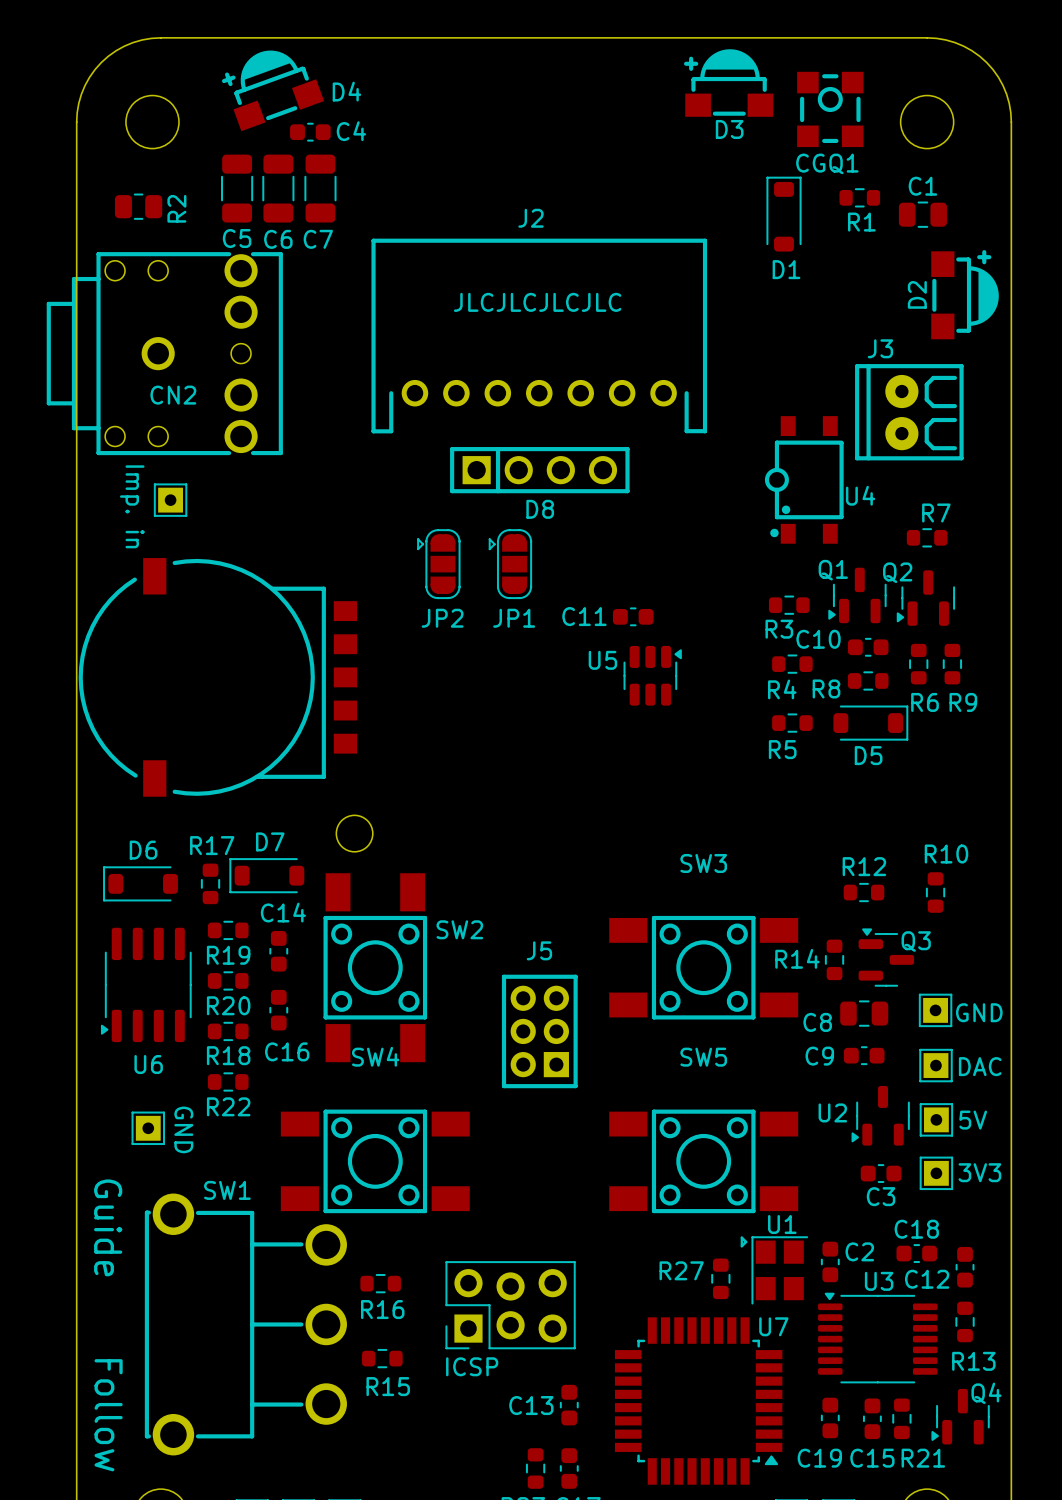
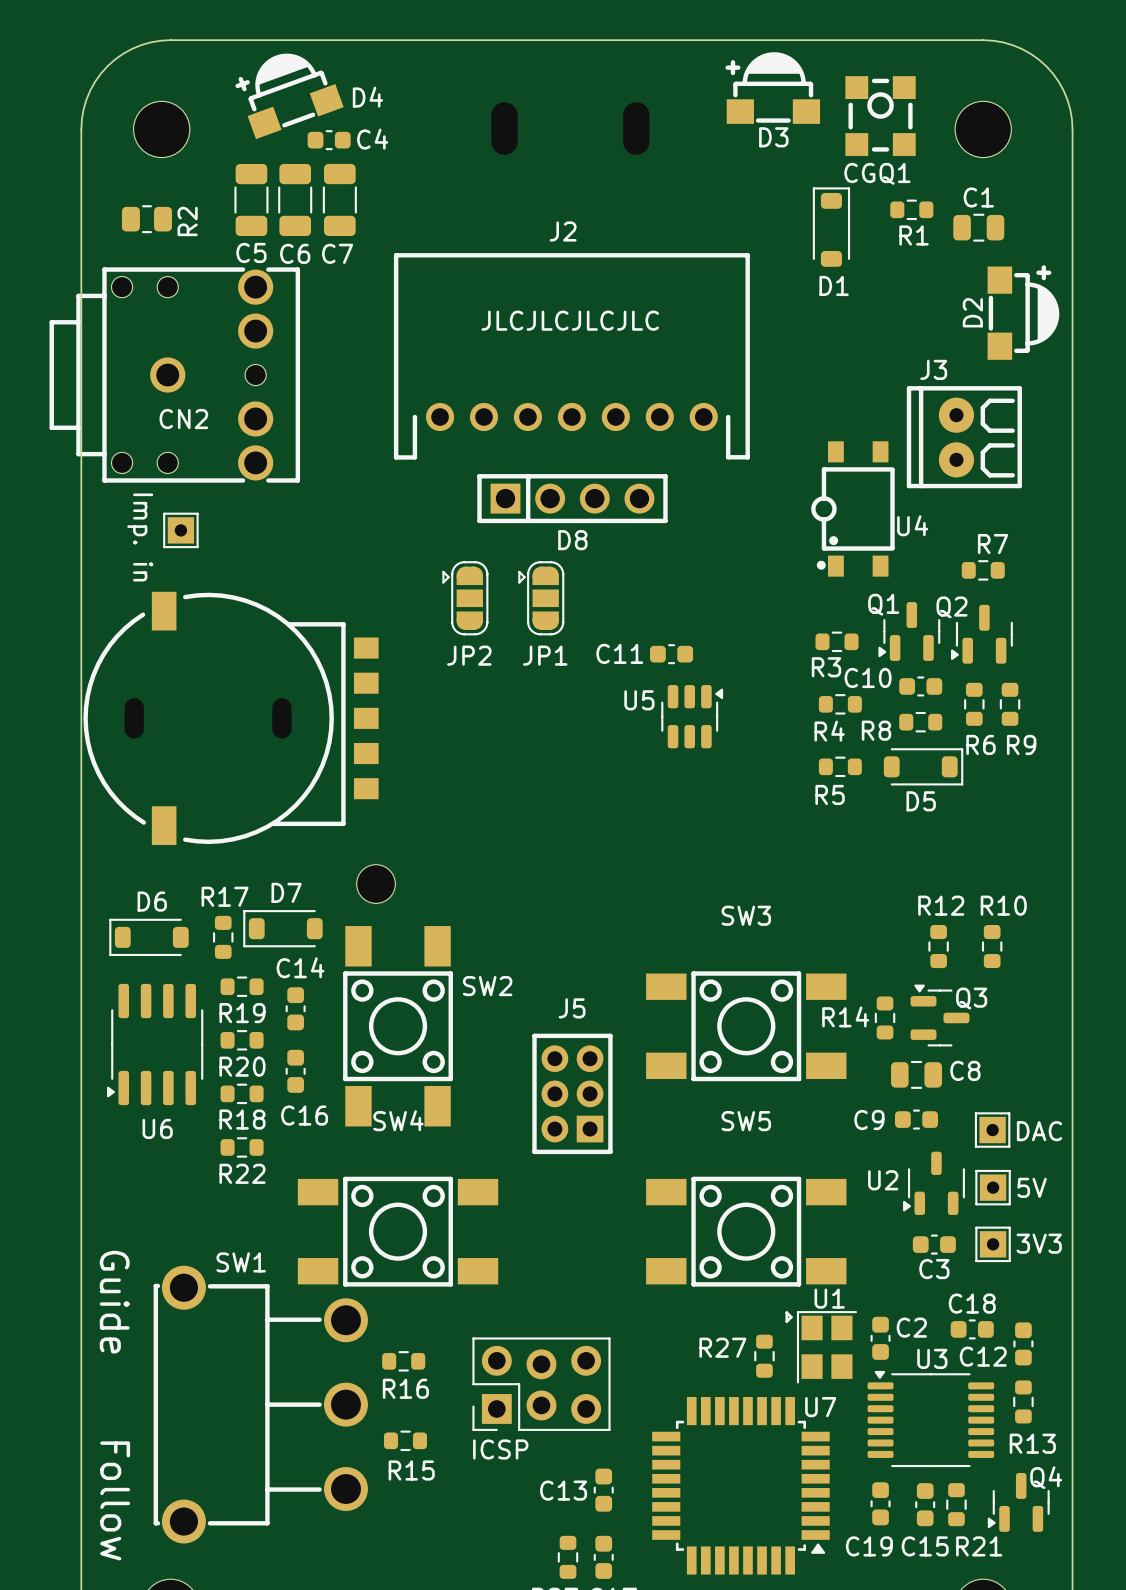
R12 rotation: 0° (863, 892) -> 90° clockwise (938, 946)
part: (935, 1010) -> none
text: GND (979, 1012) -> none
C8 name position: C8 (817, 1022) -> C8 (965, 1070)
part: (148, 1128) -> none
text: GND (183, 1129) -> none

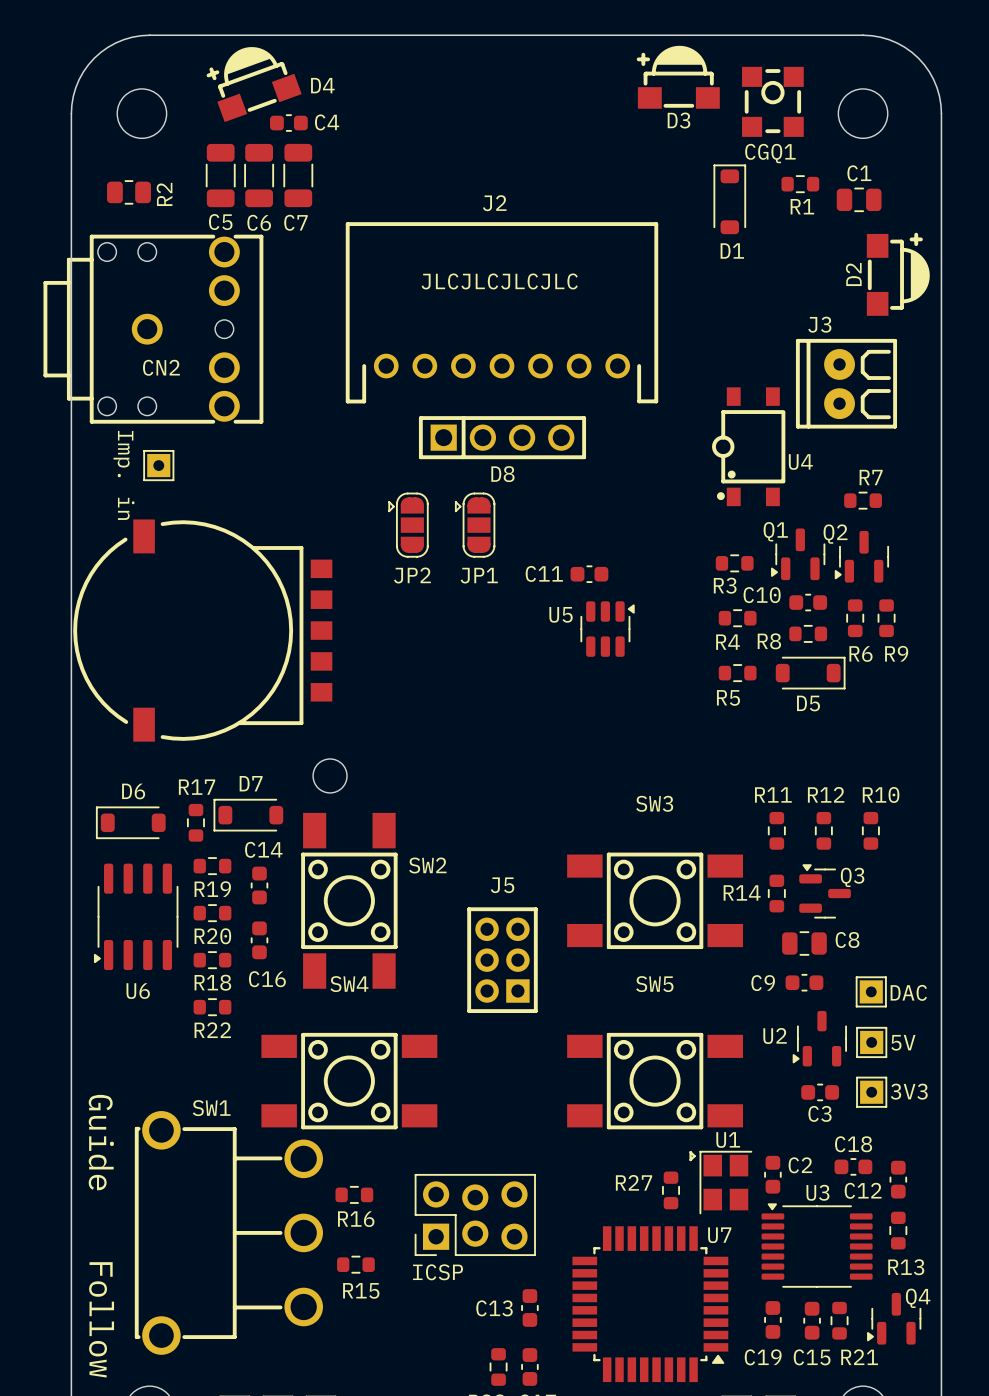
R11: none -> (776, 830)

